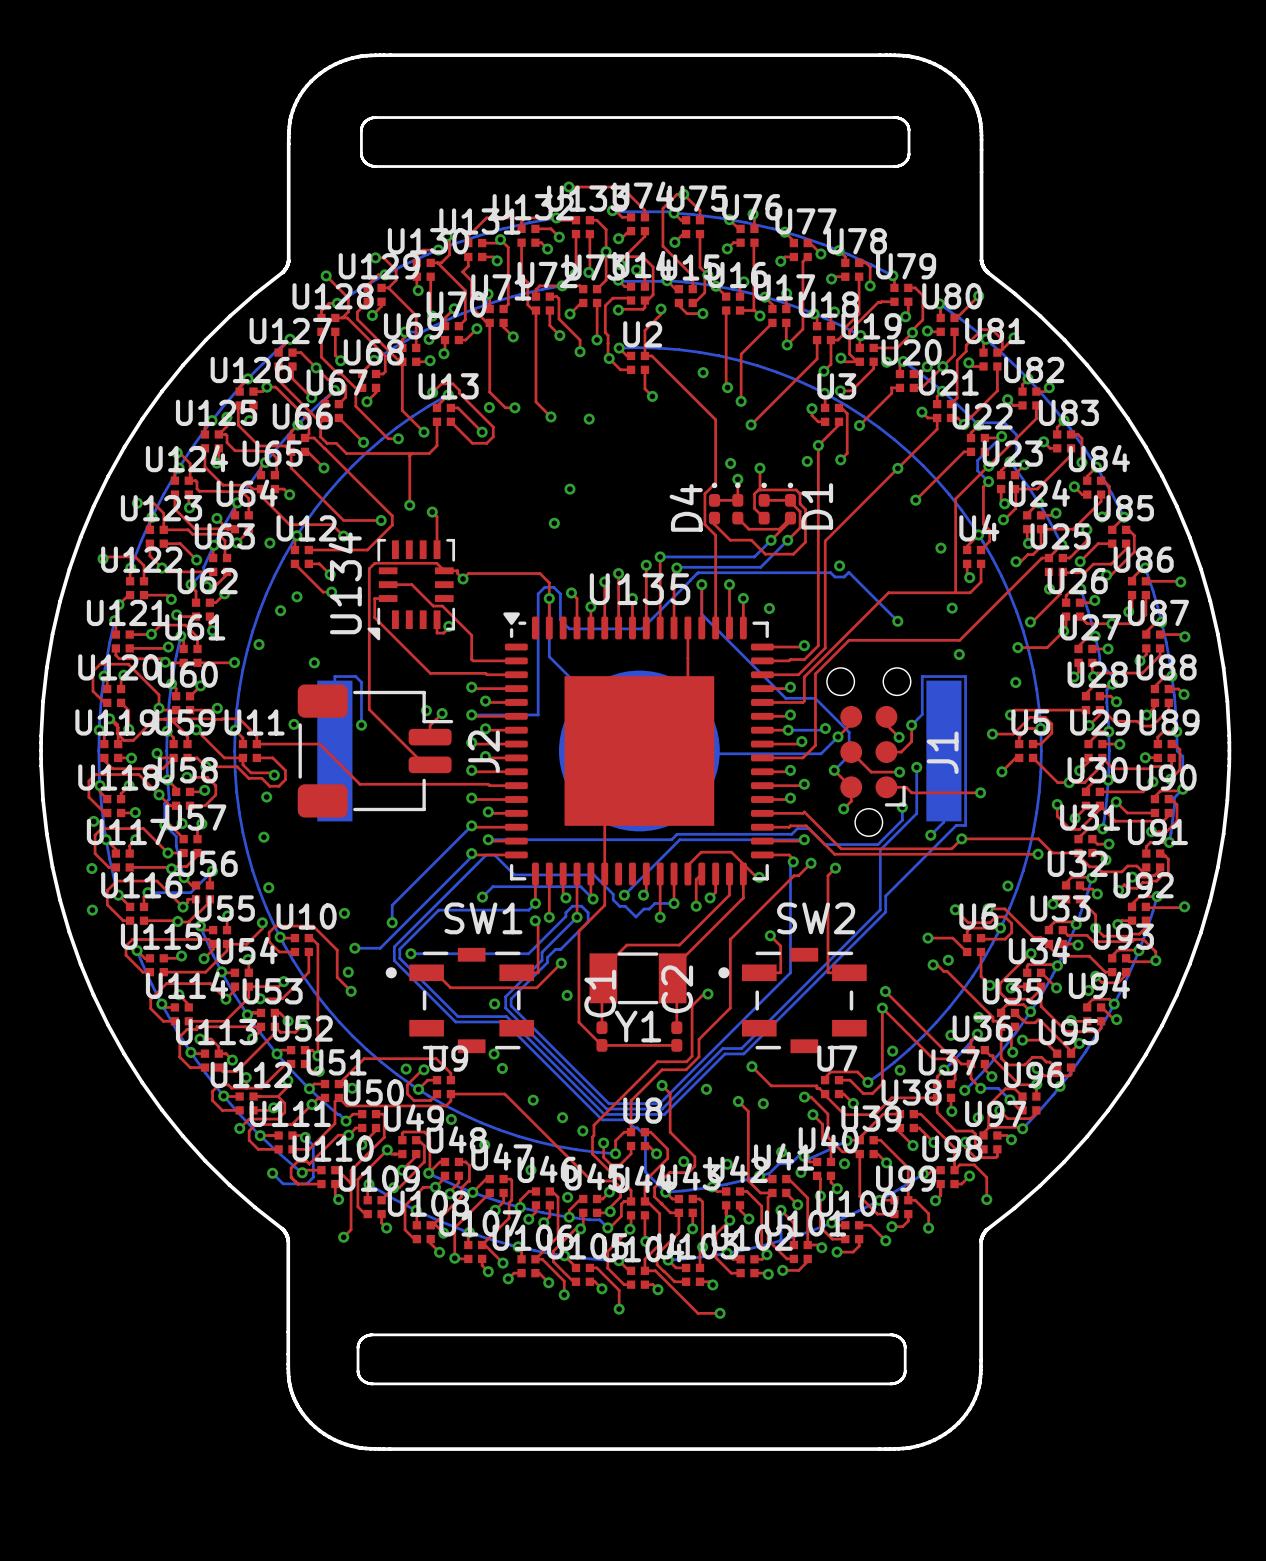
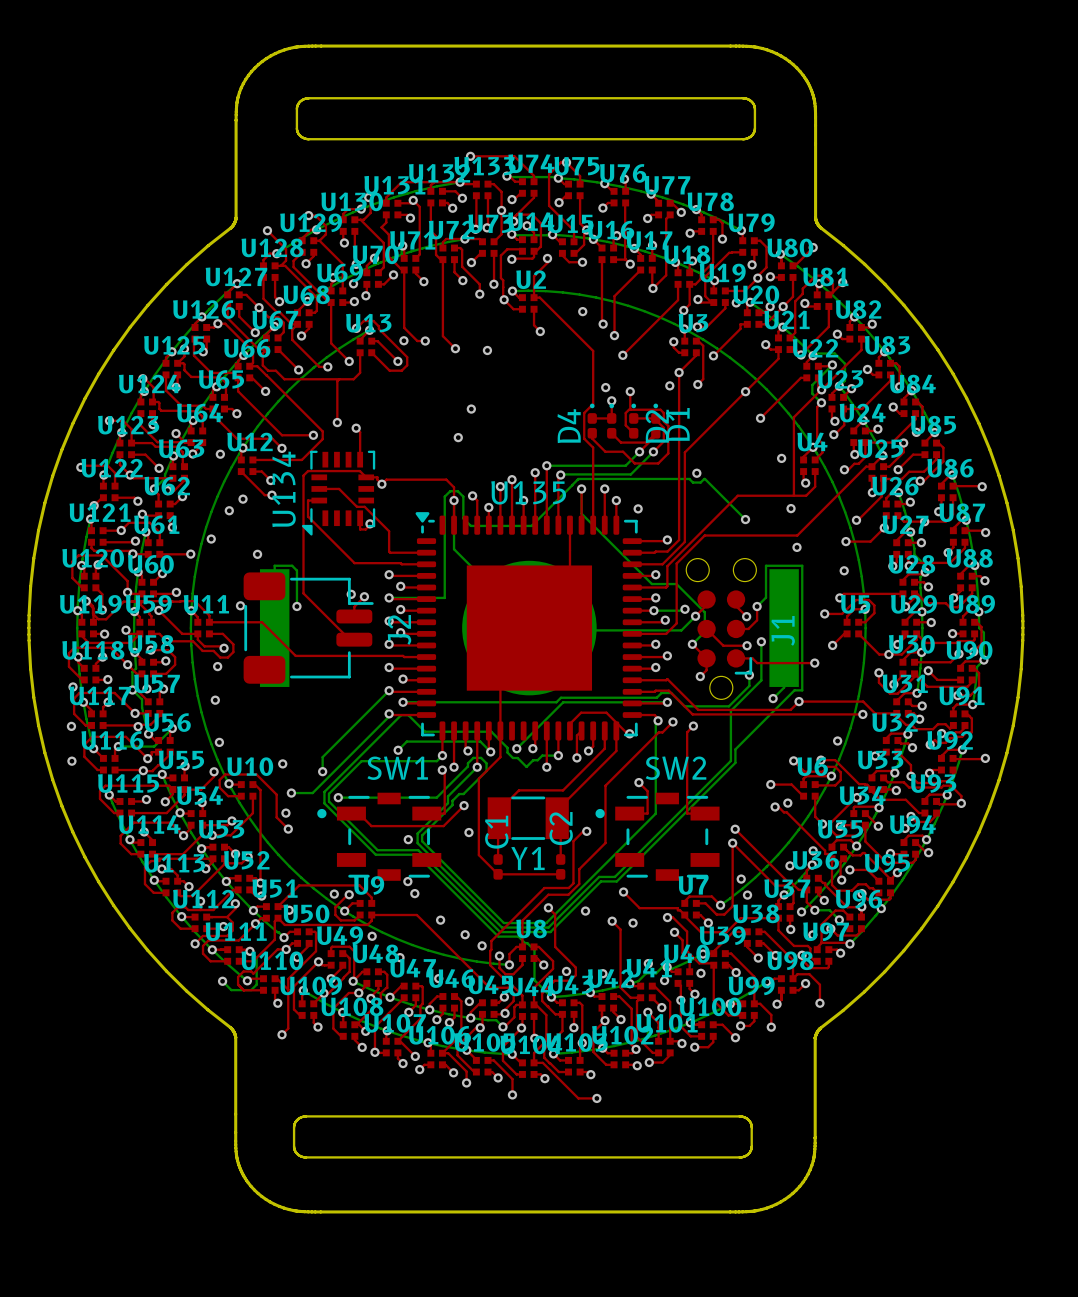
D2 name: none -> D2 (657, 426)

